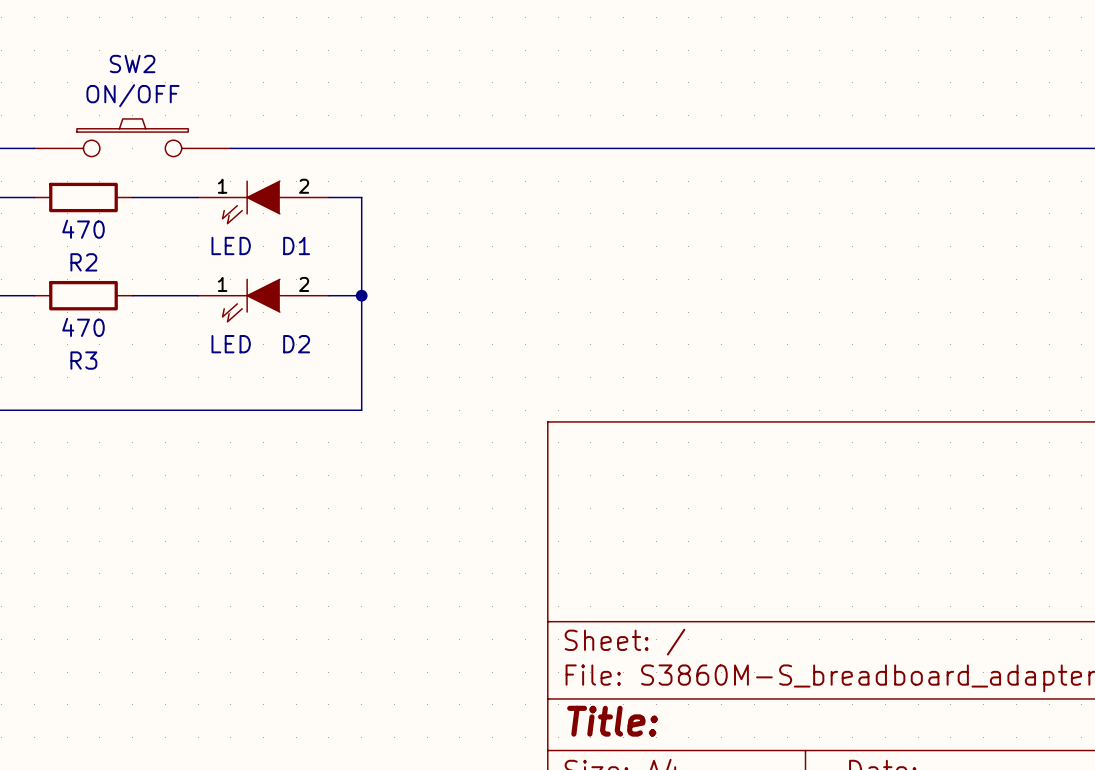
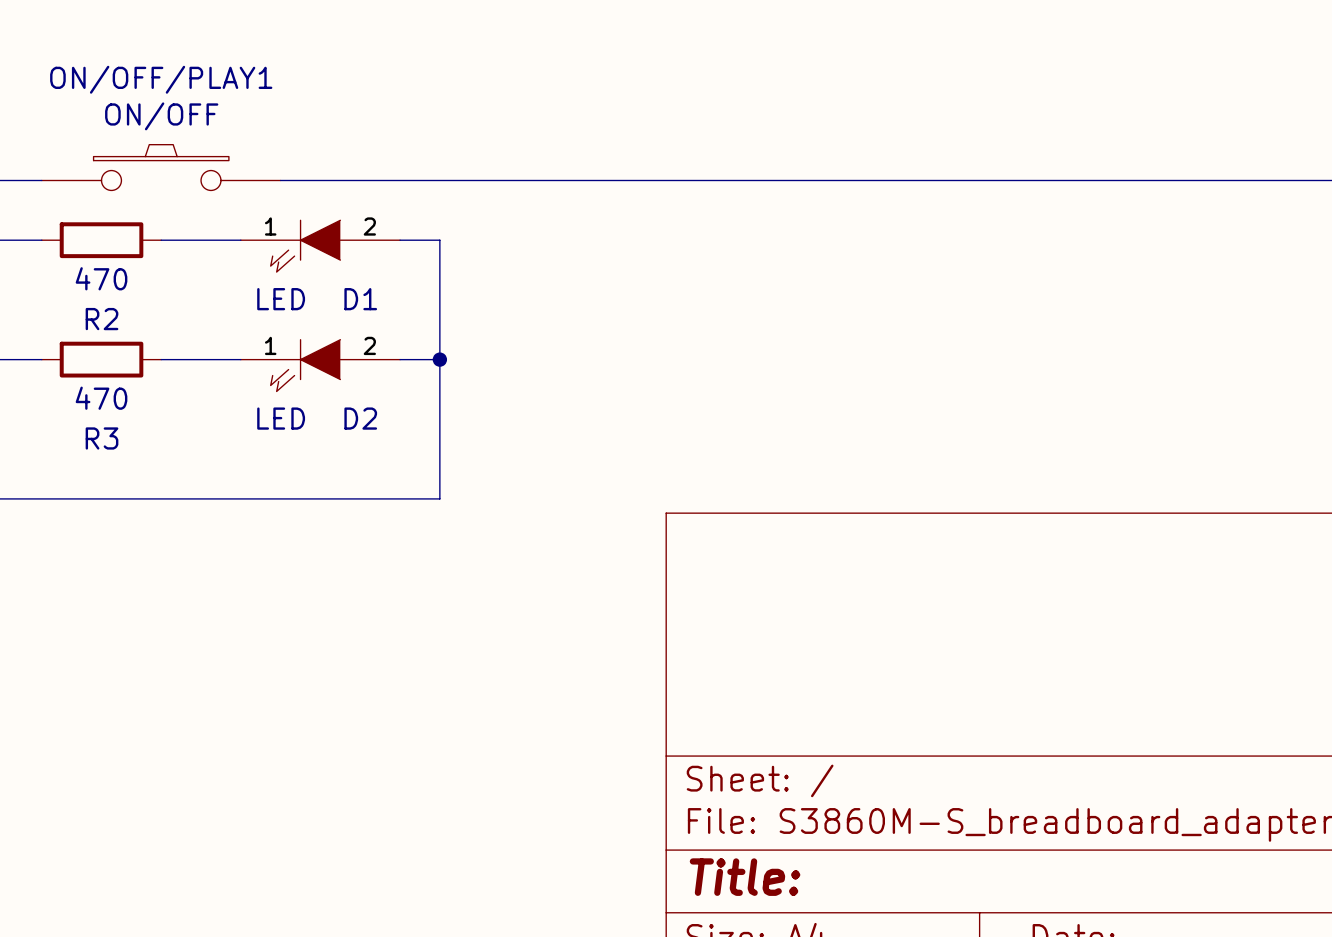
SW2 name: SW2 (132, 64) -> ON/OFF/PLAY1 (161, 79)

